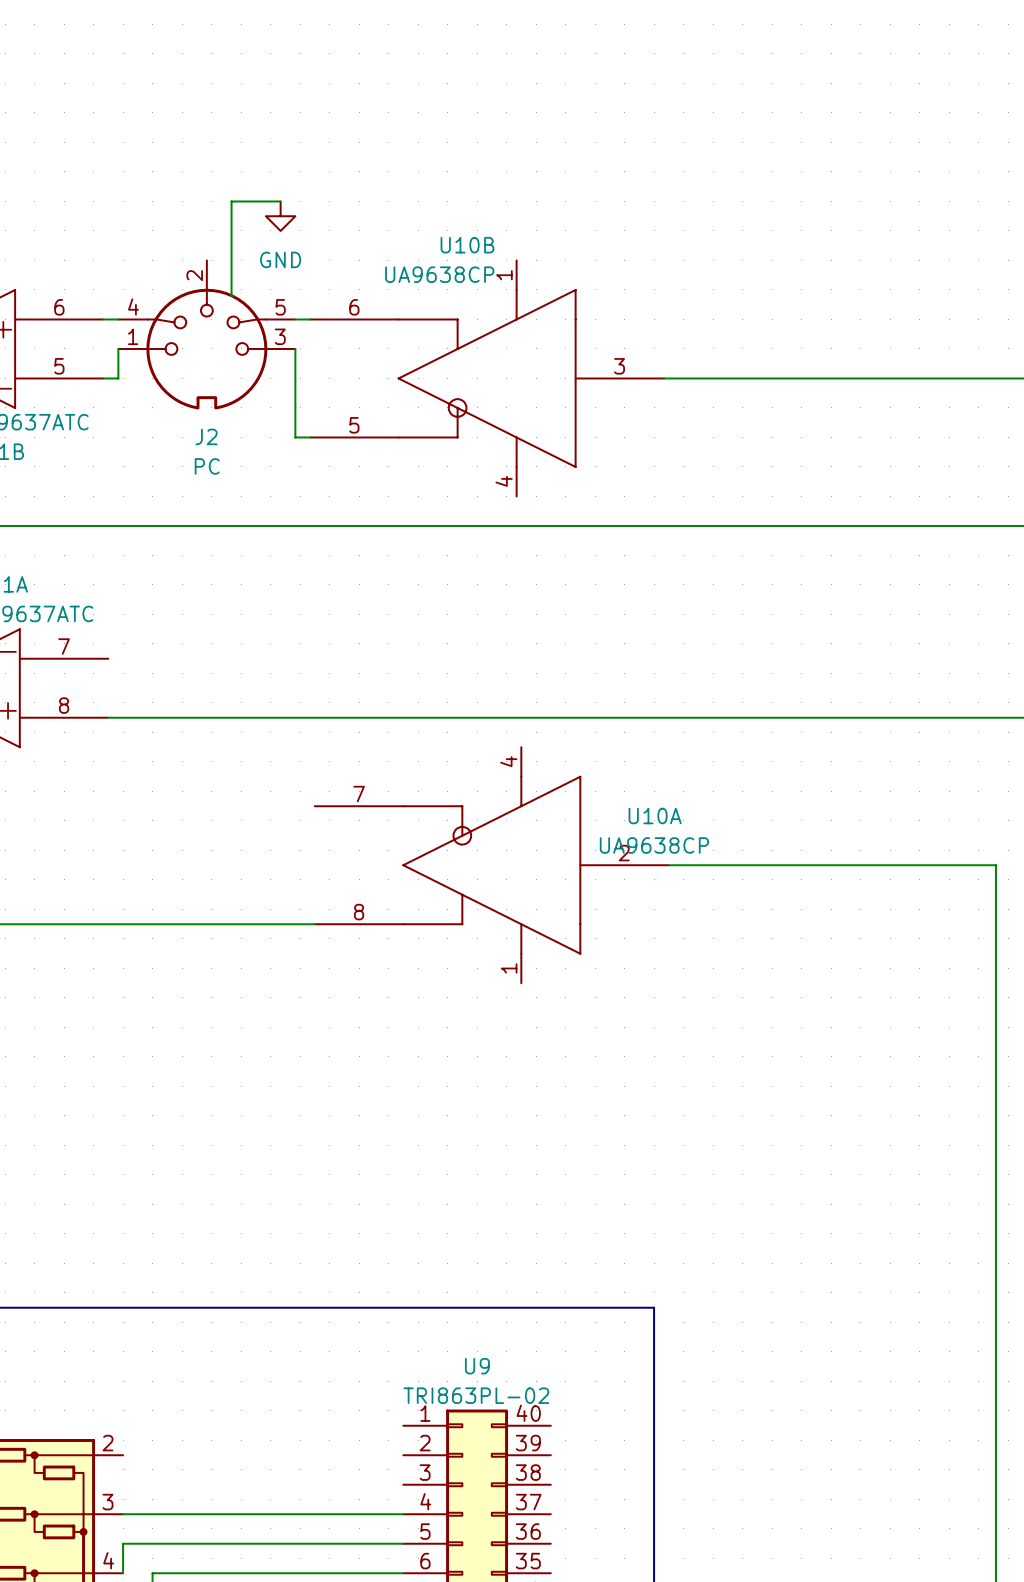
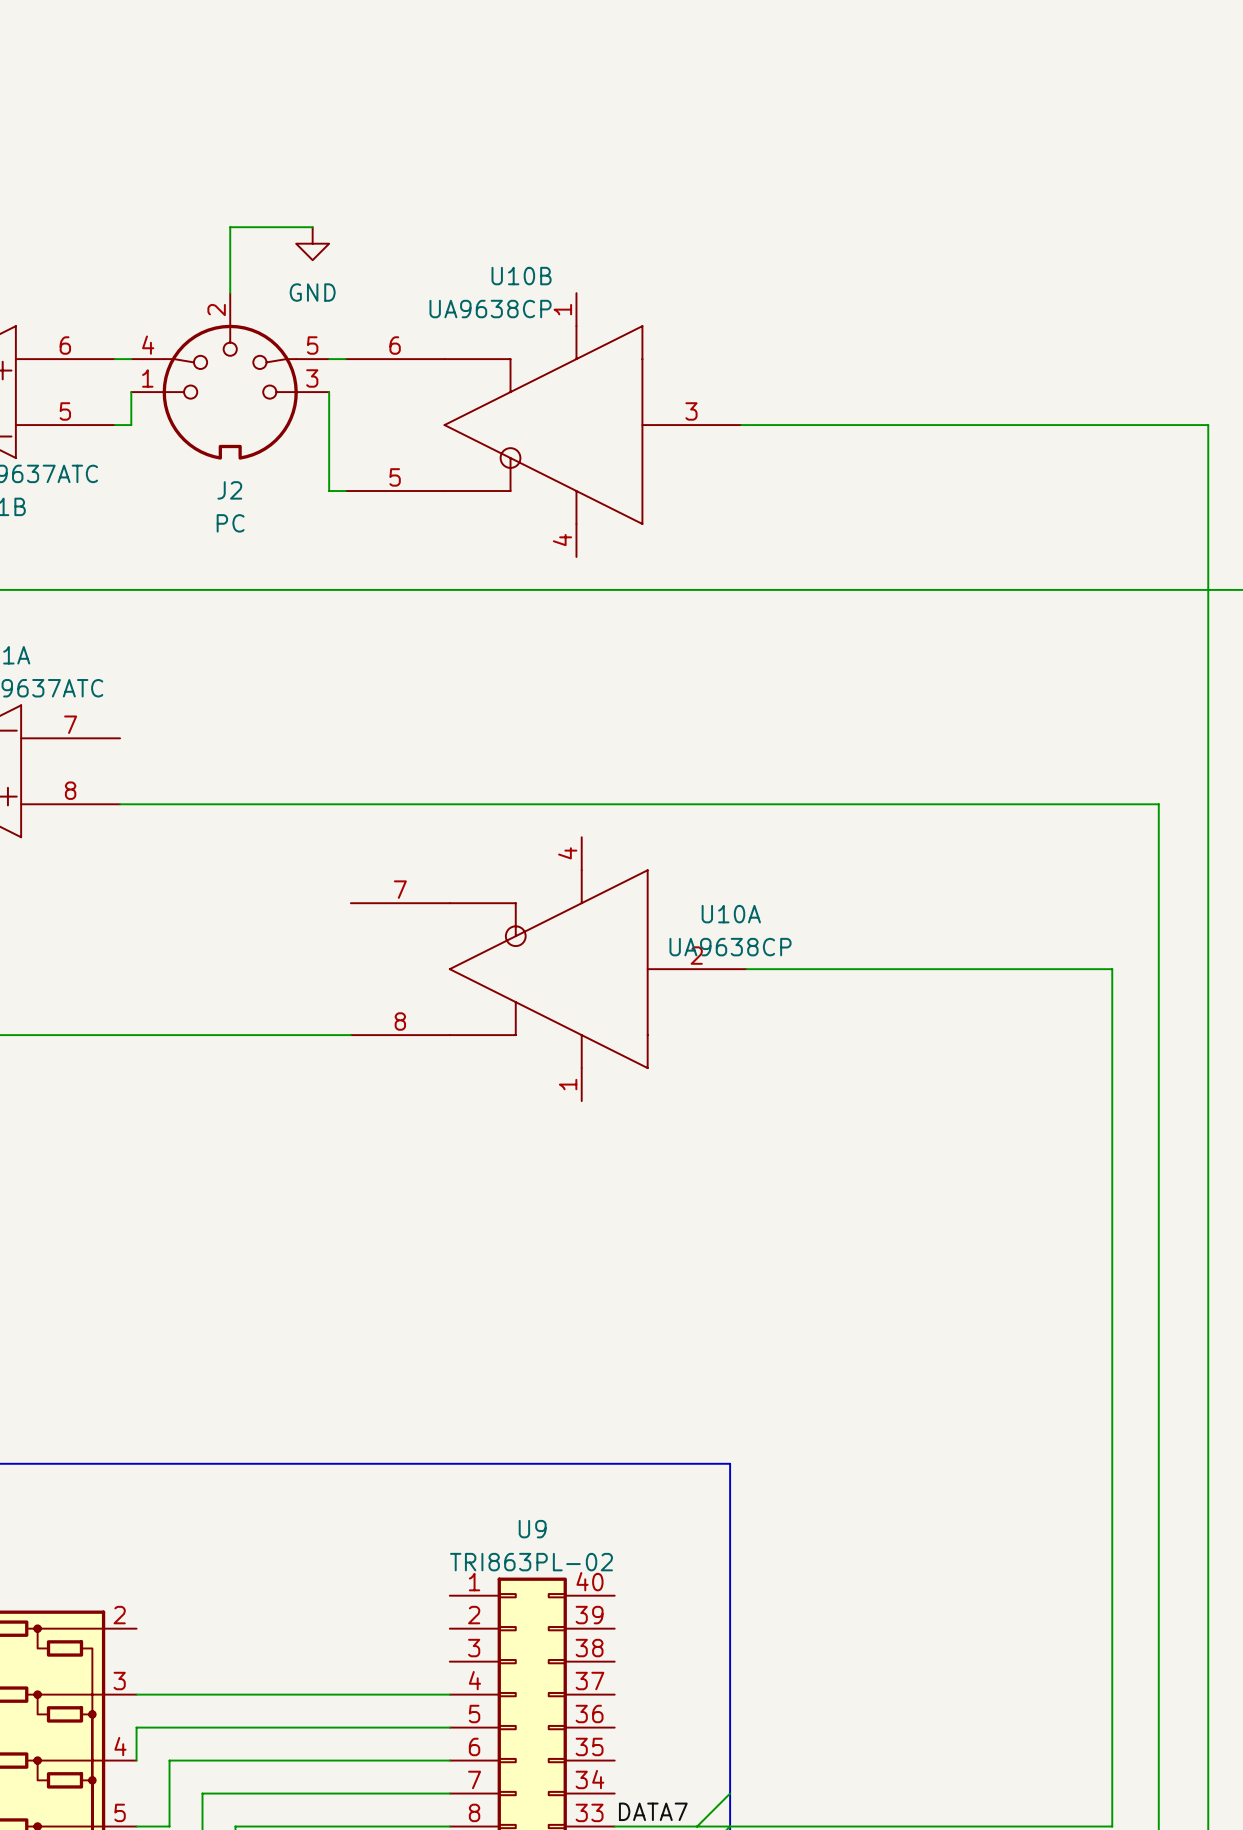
wire: (231, 201) (231, 295) (233, 295) -> (257, 227) (230, 227) (230, 293)

